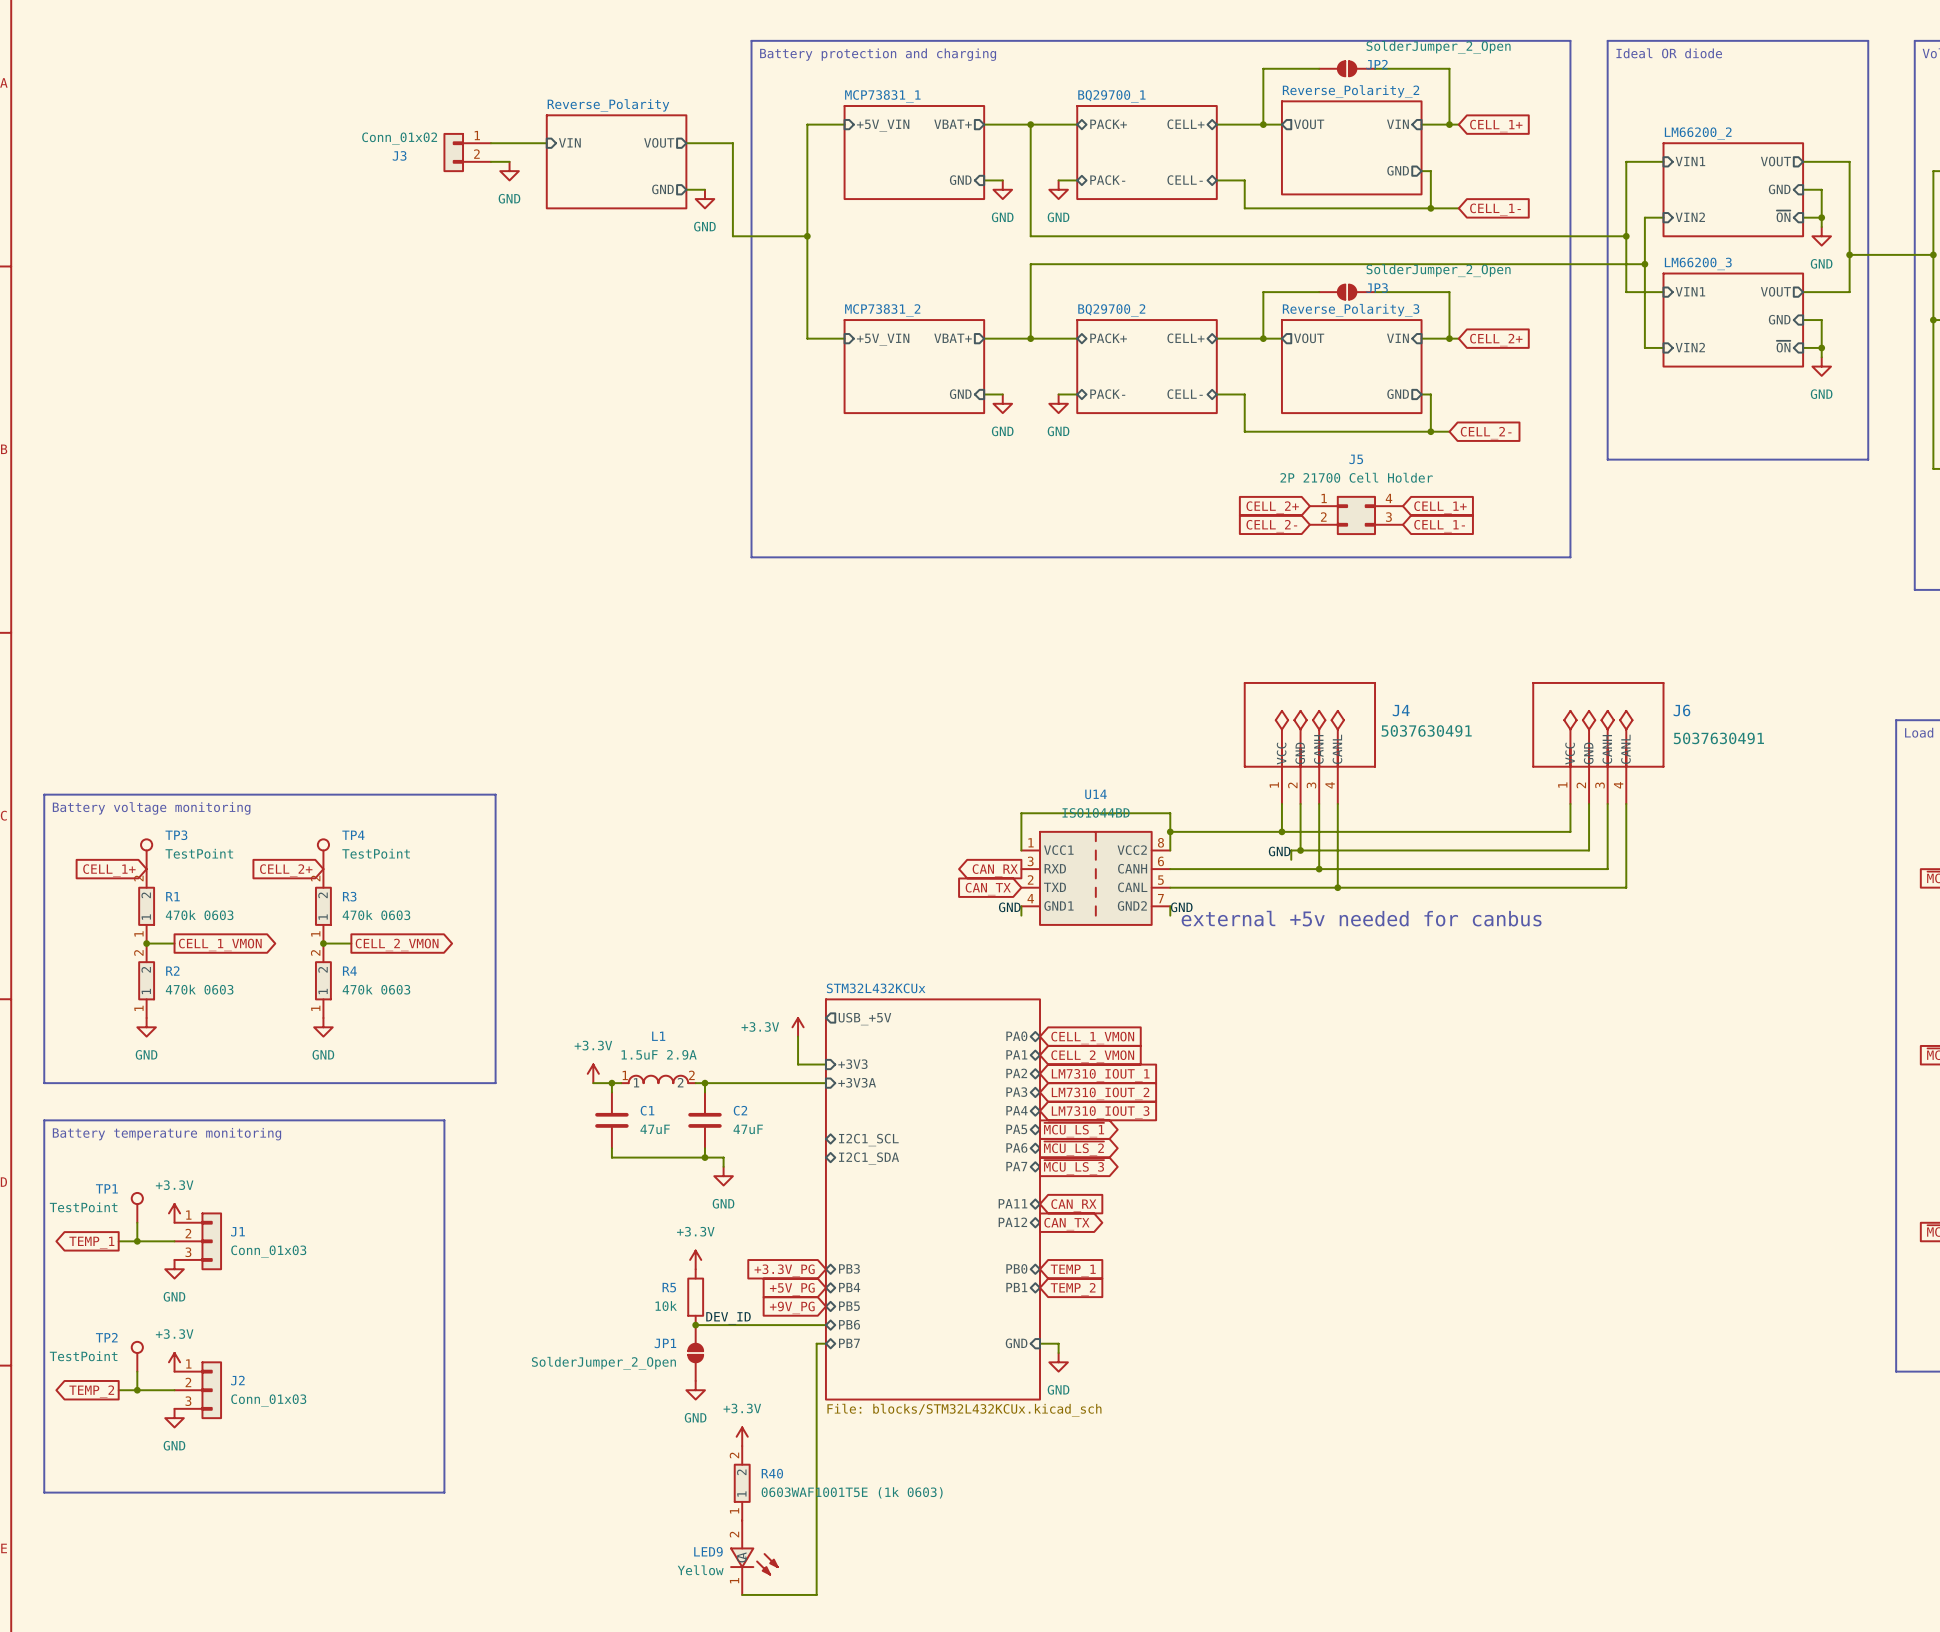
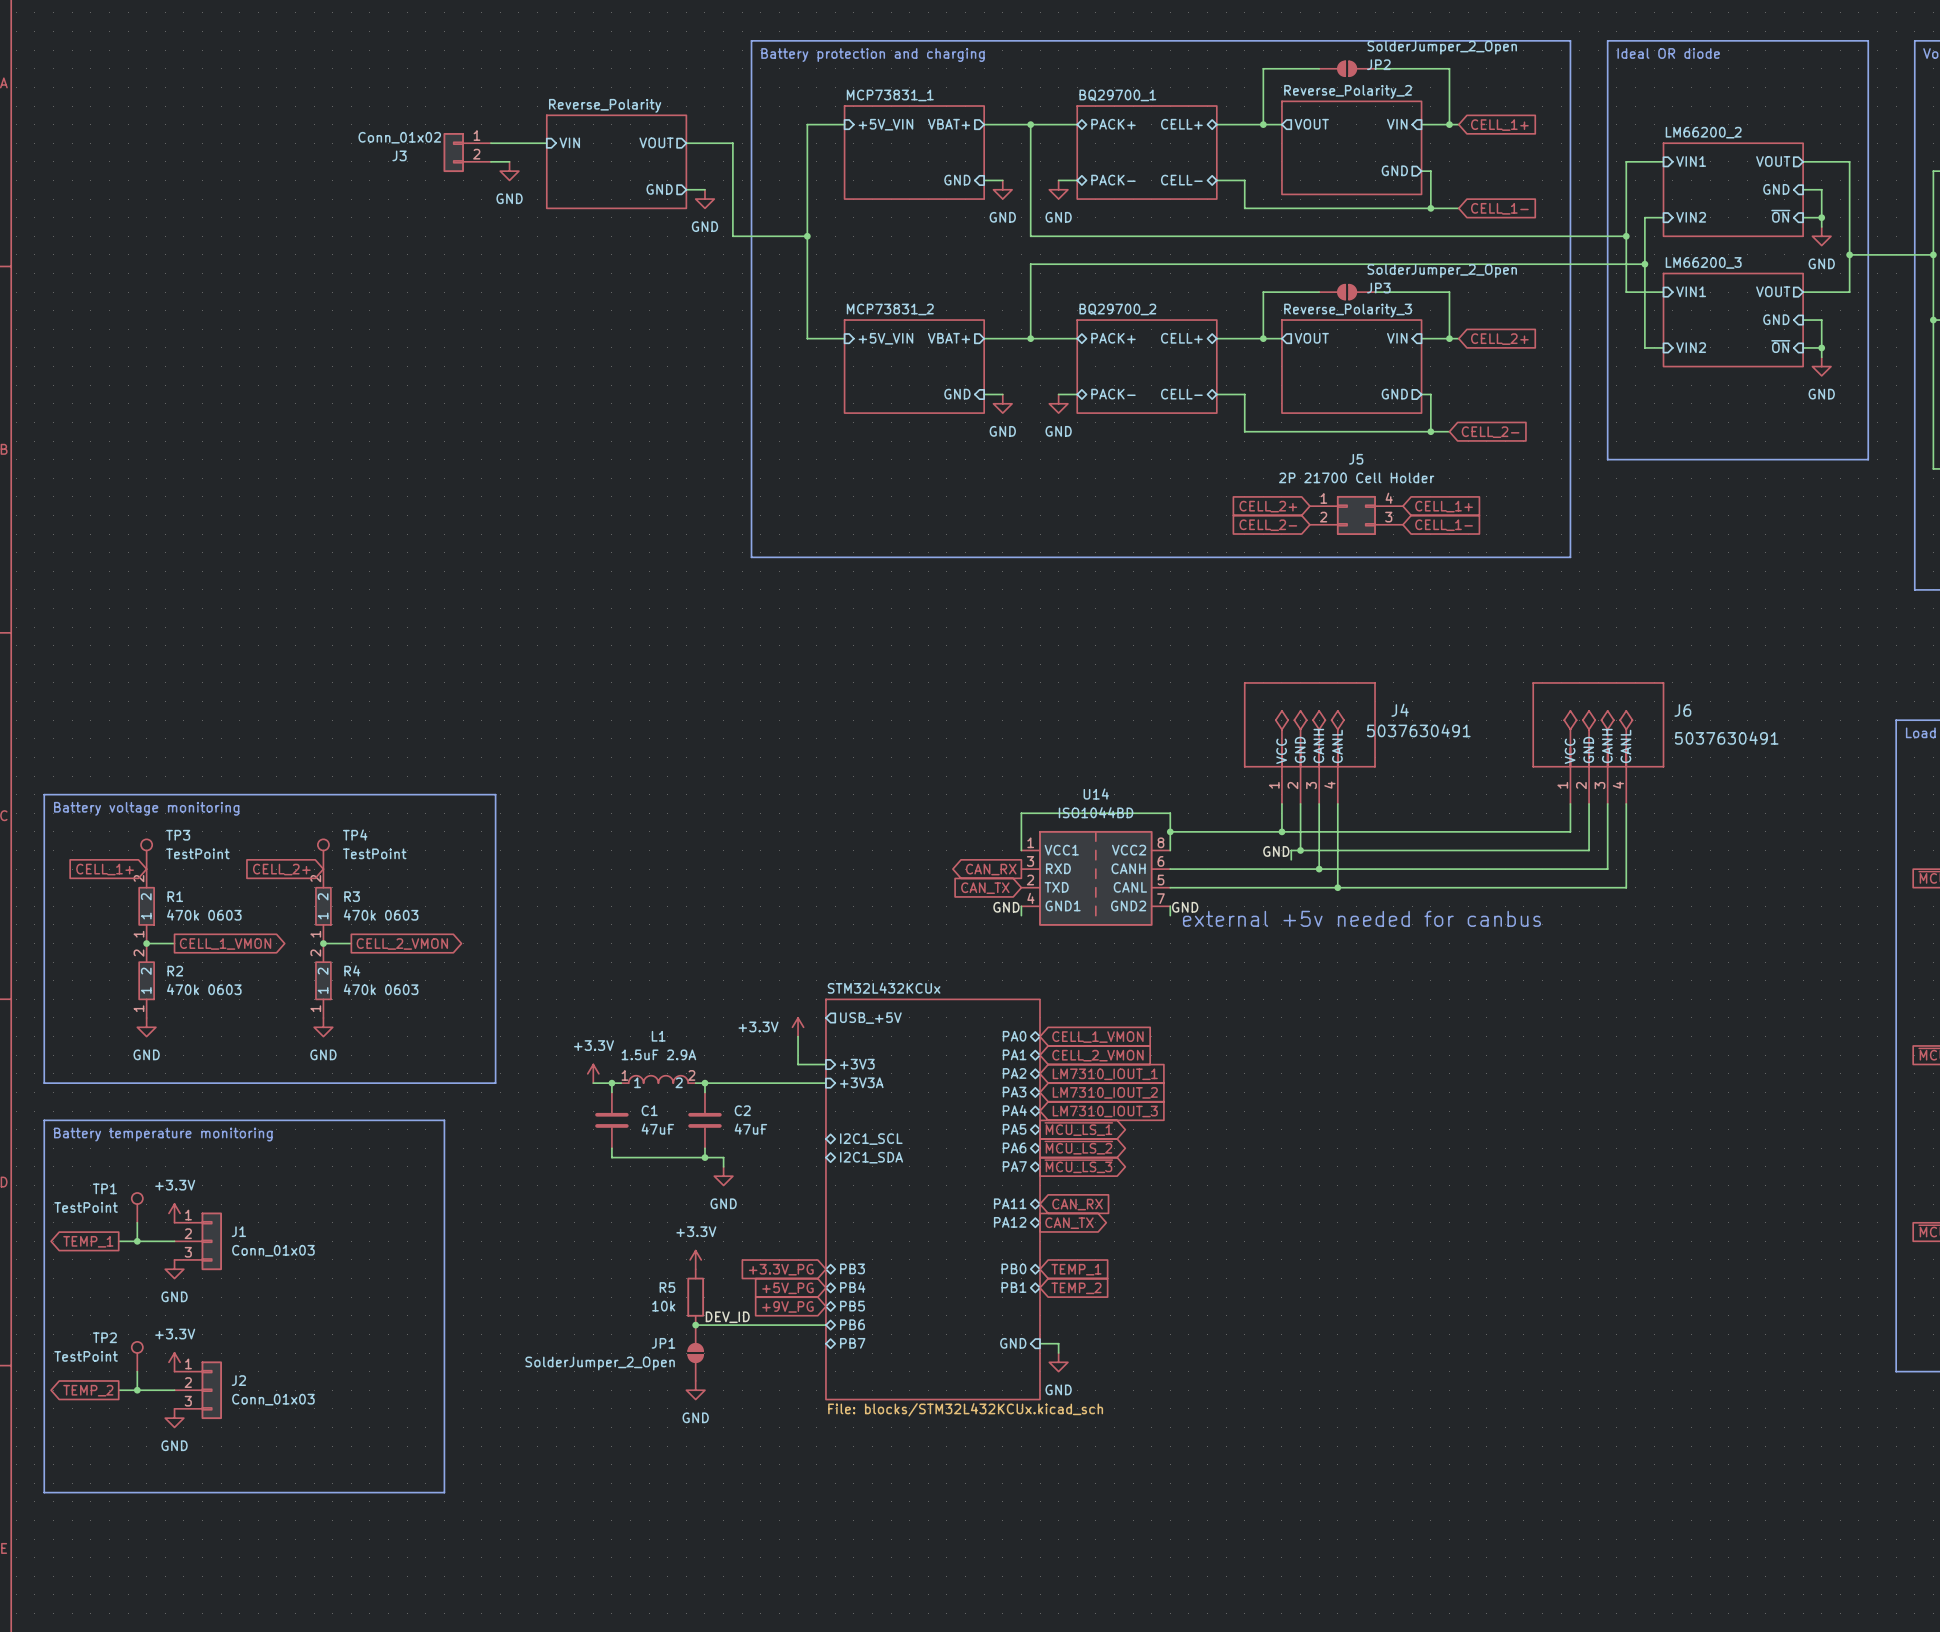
wire: (825, 1343) (816, 1343) (816, 1594) (742, 1594) -> none
power symbol: +3.3V (742, 1436) -> none
R40: 0603WAF1001T5E (1k 0603) (742, 1483) -> none
LED9: Yellow (754, 1557) -> none

